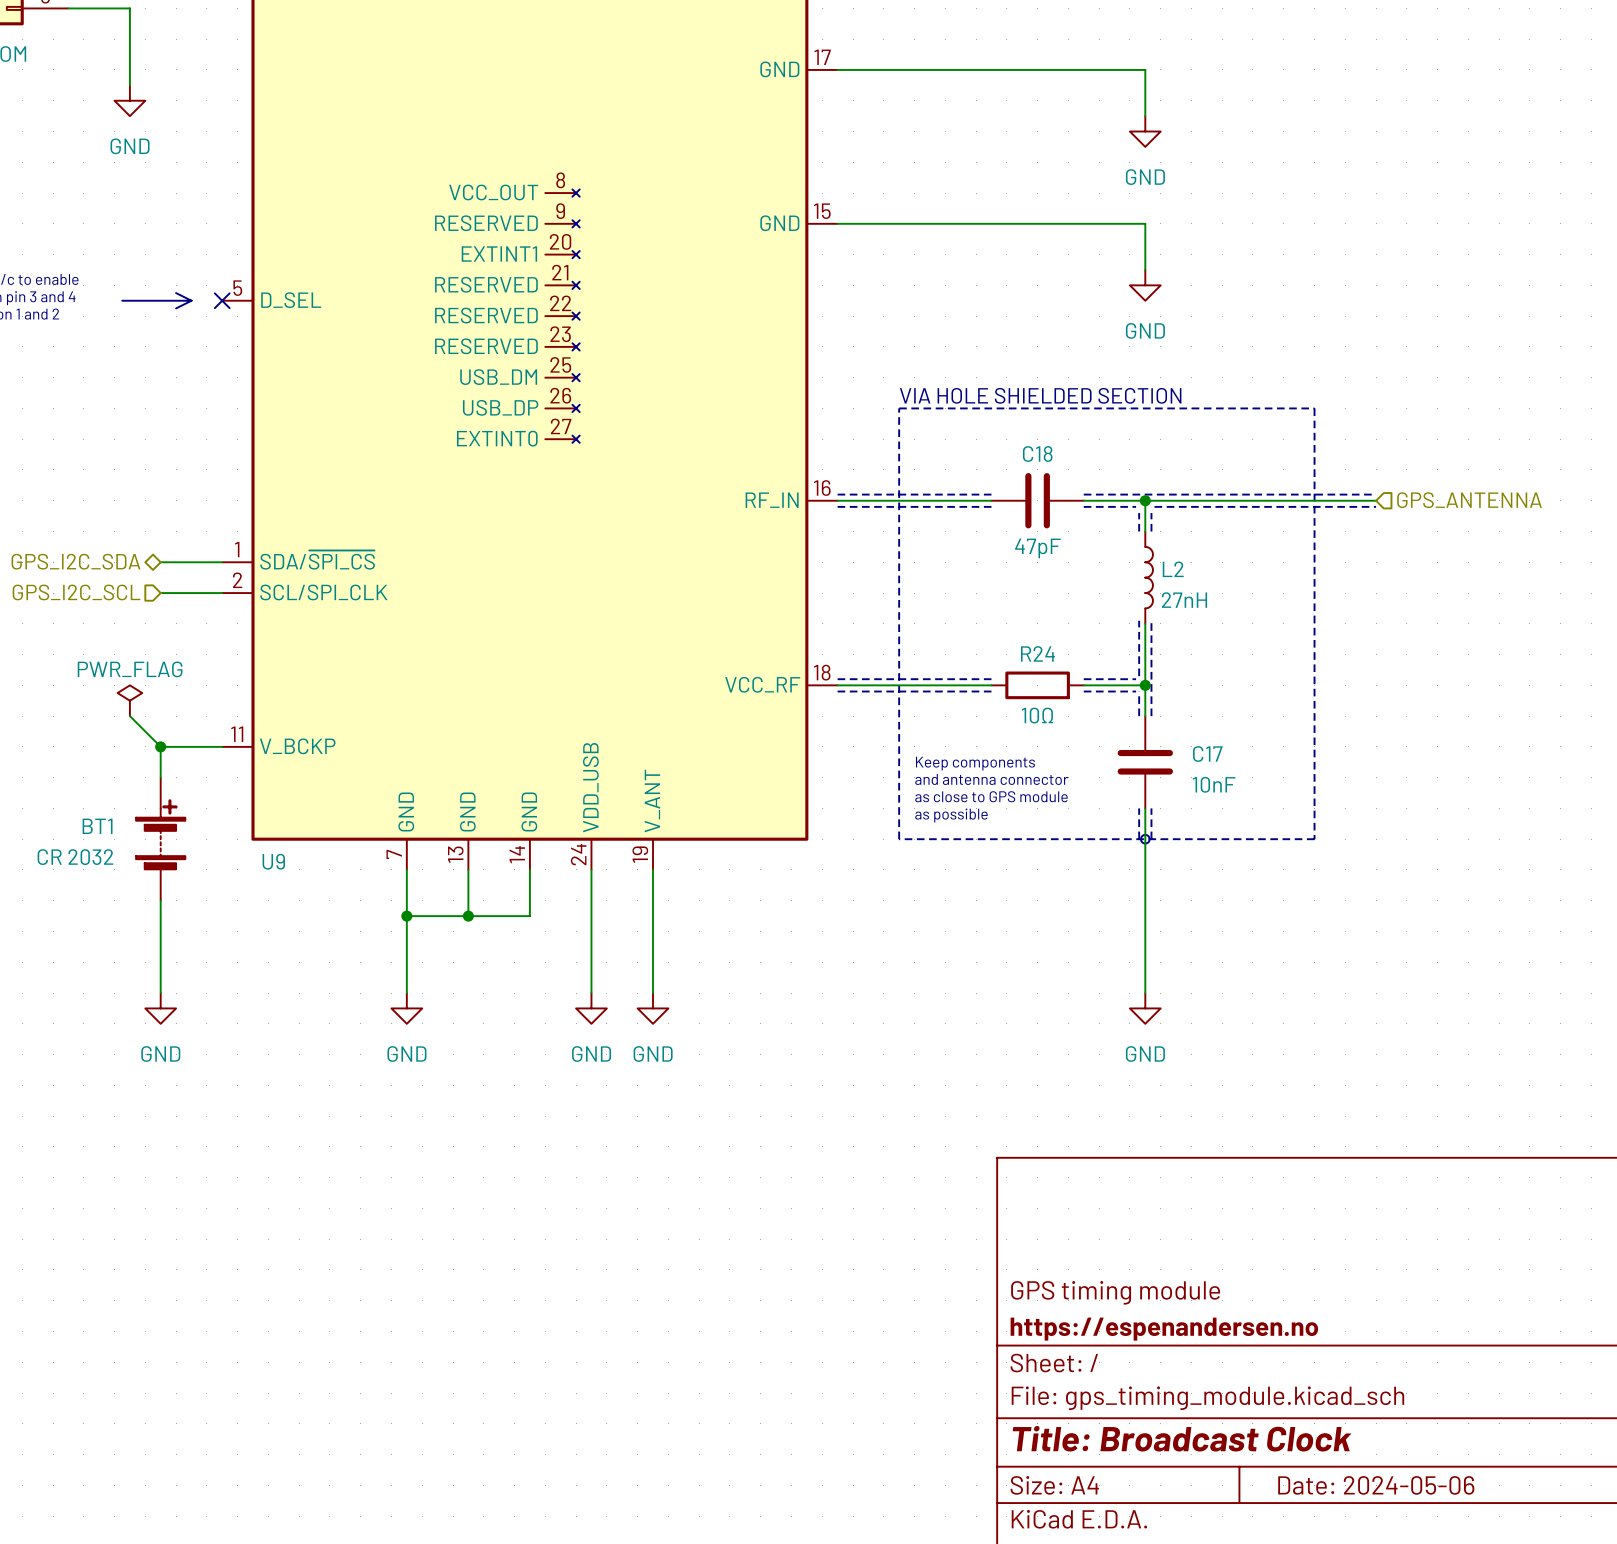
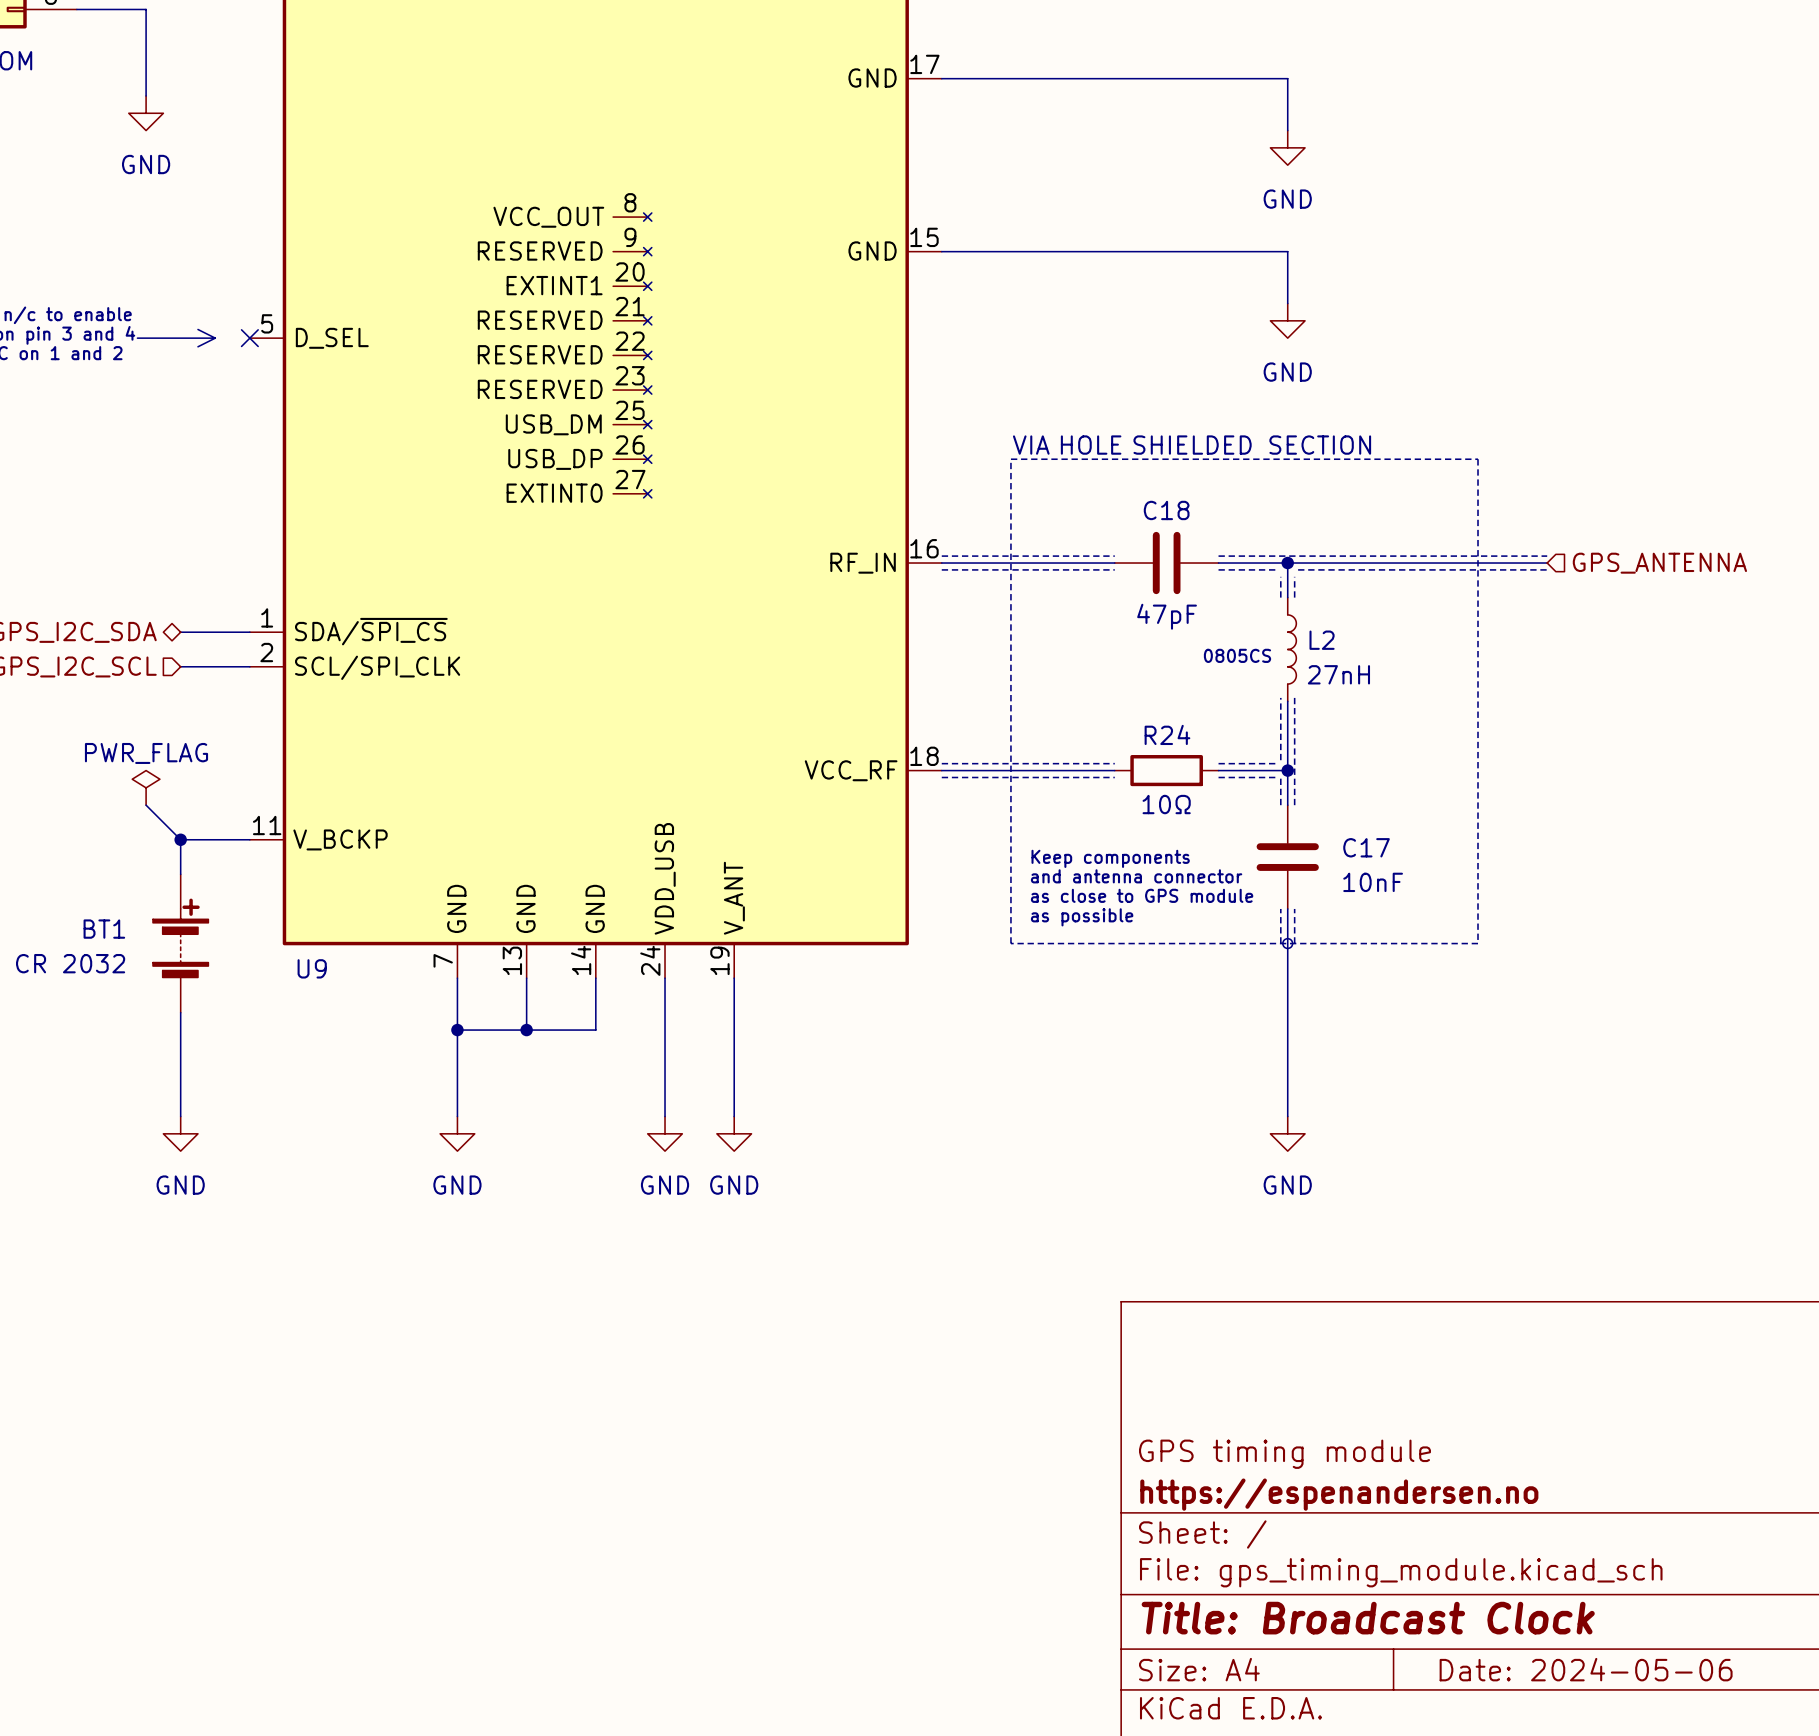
text: none -> 0805CS (1237, 655)

